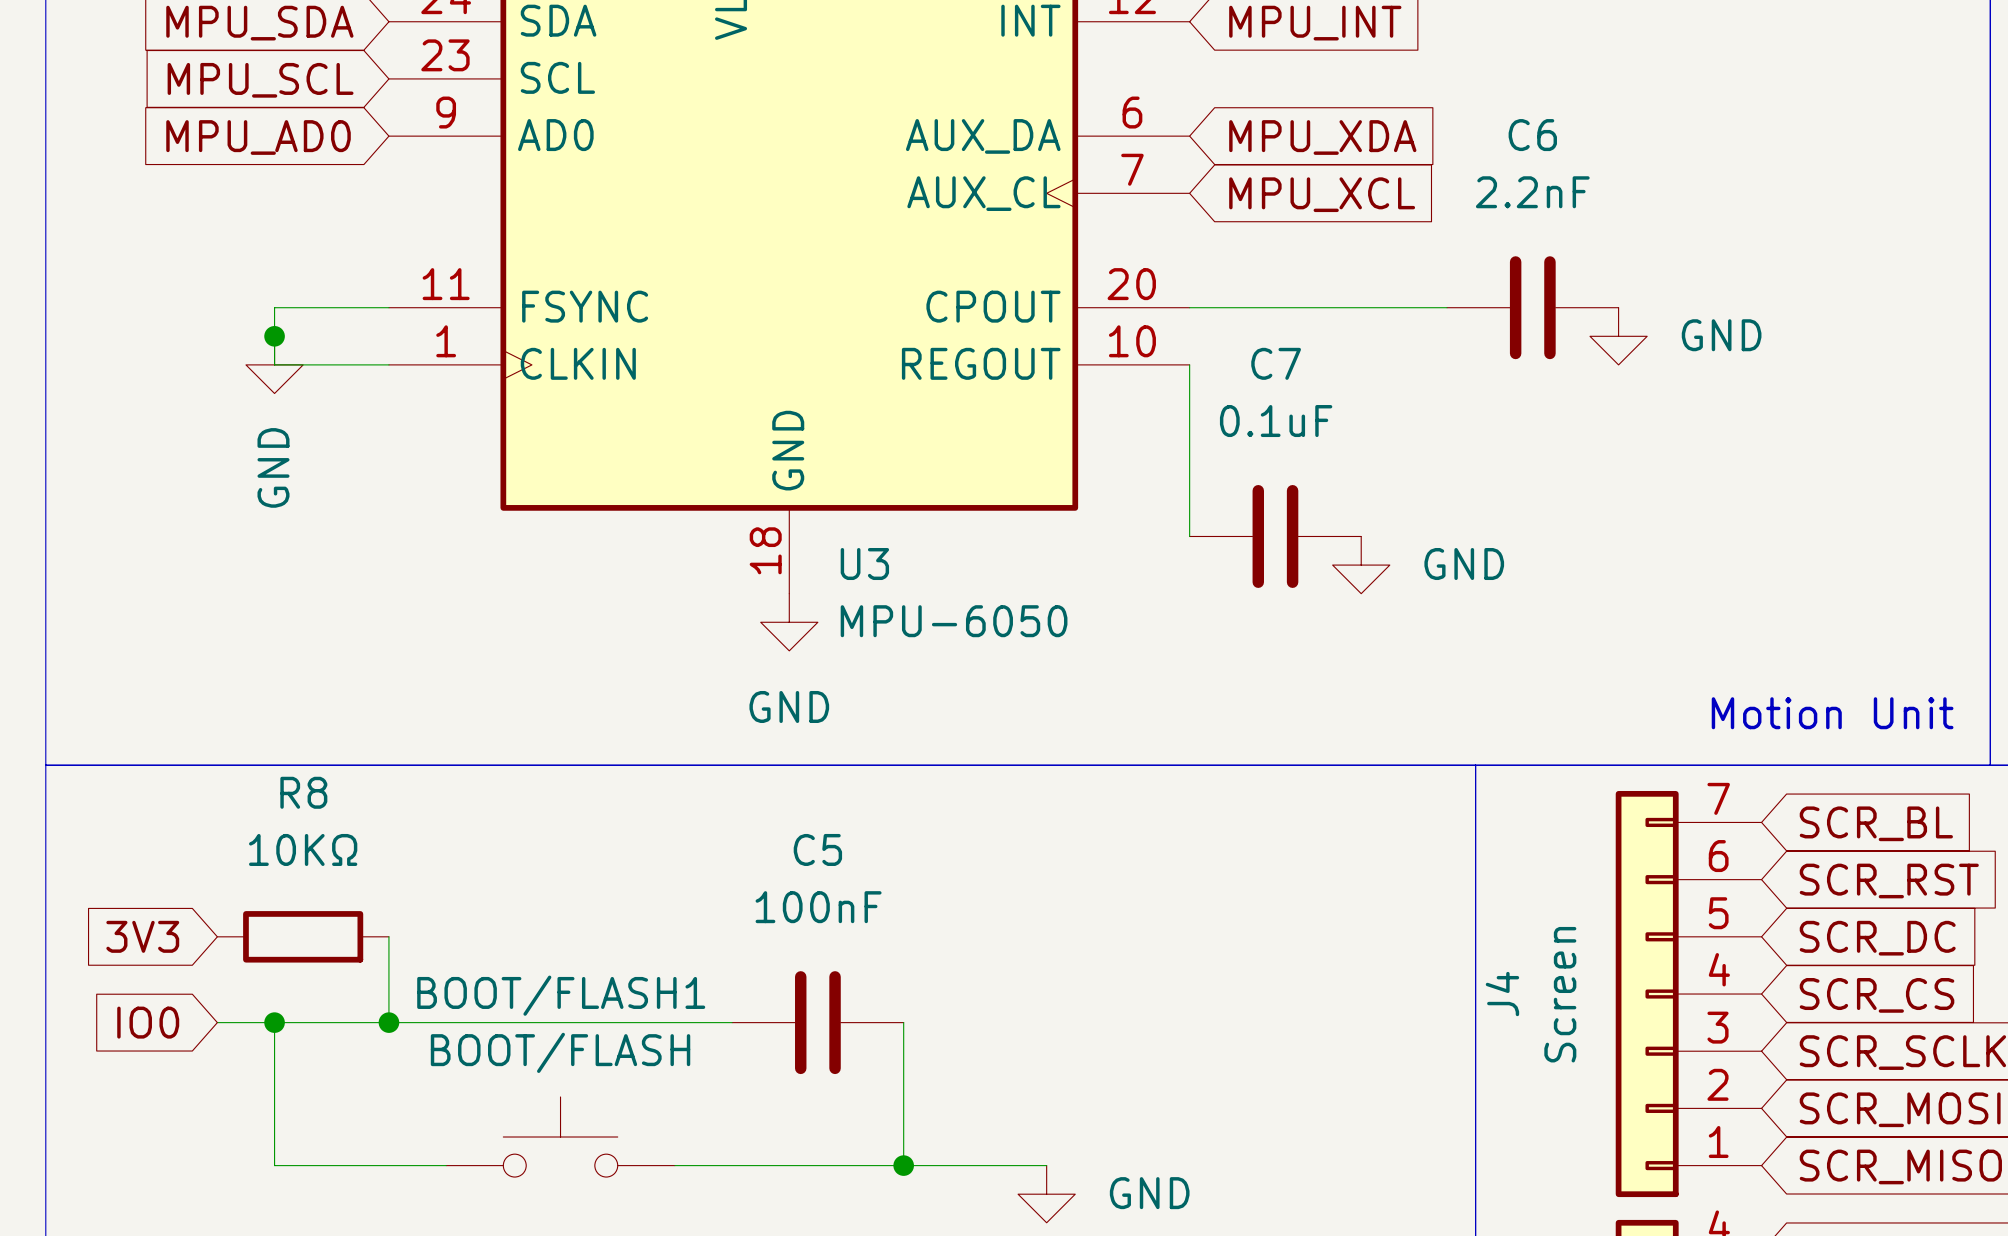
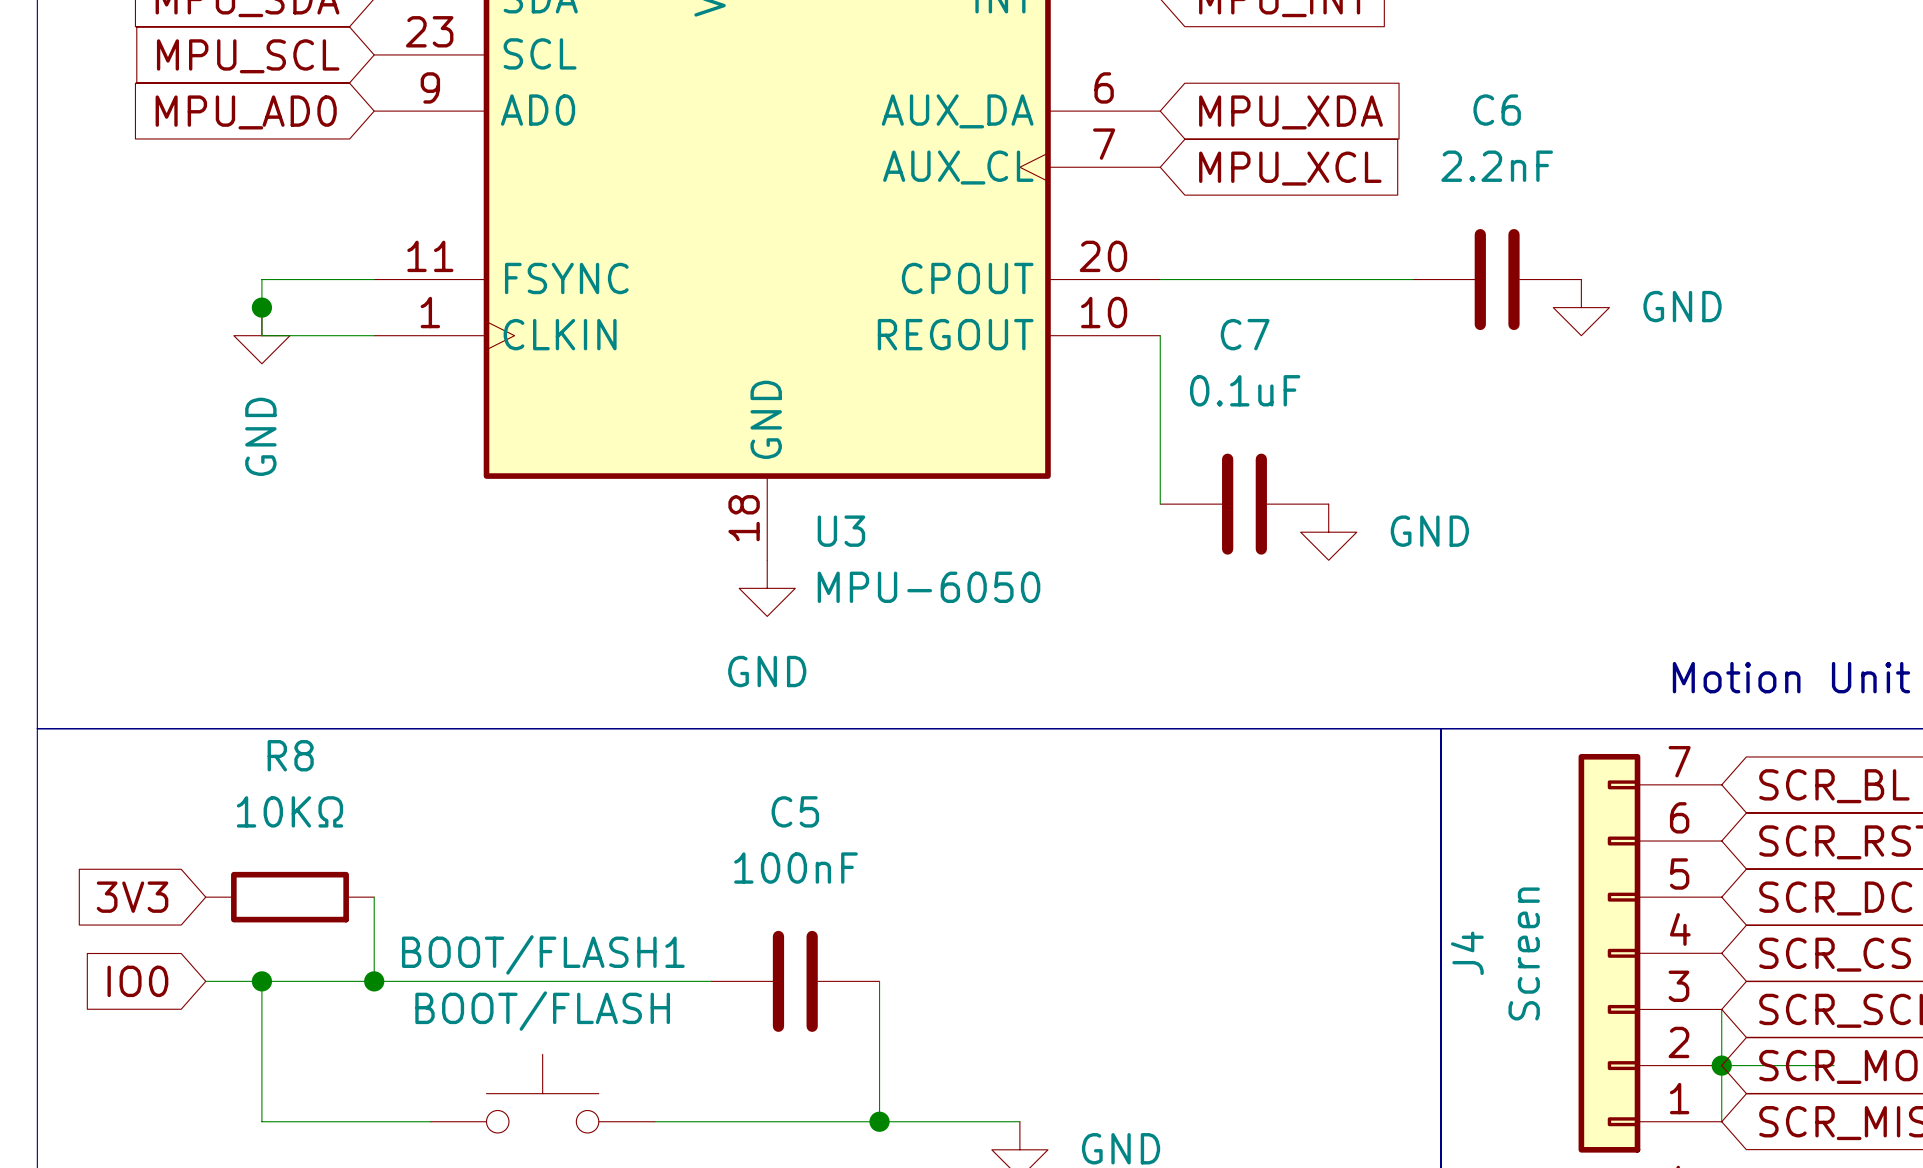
wire: none -> (1721, 1009) (1721, 1121)
wire: none -> (1721, 1065) (1834, 1065)
junction: none -> (1721, 1065)

